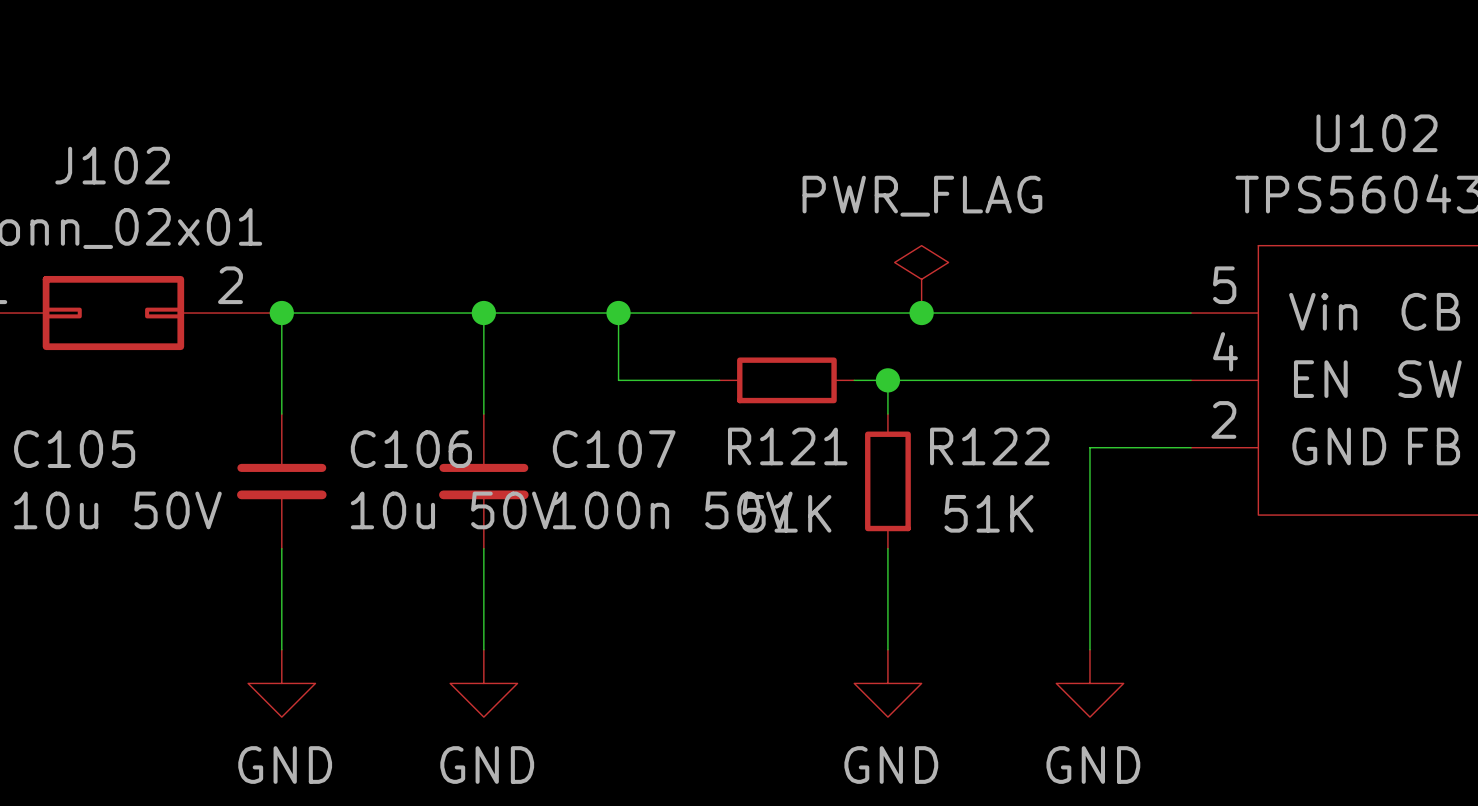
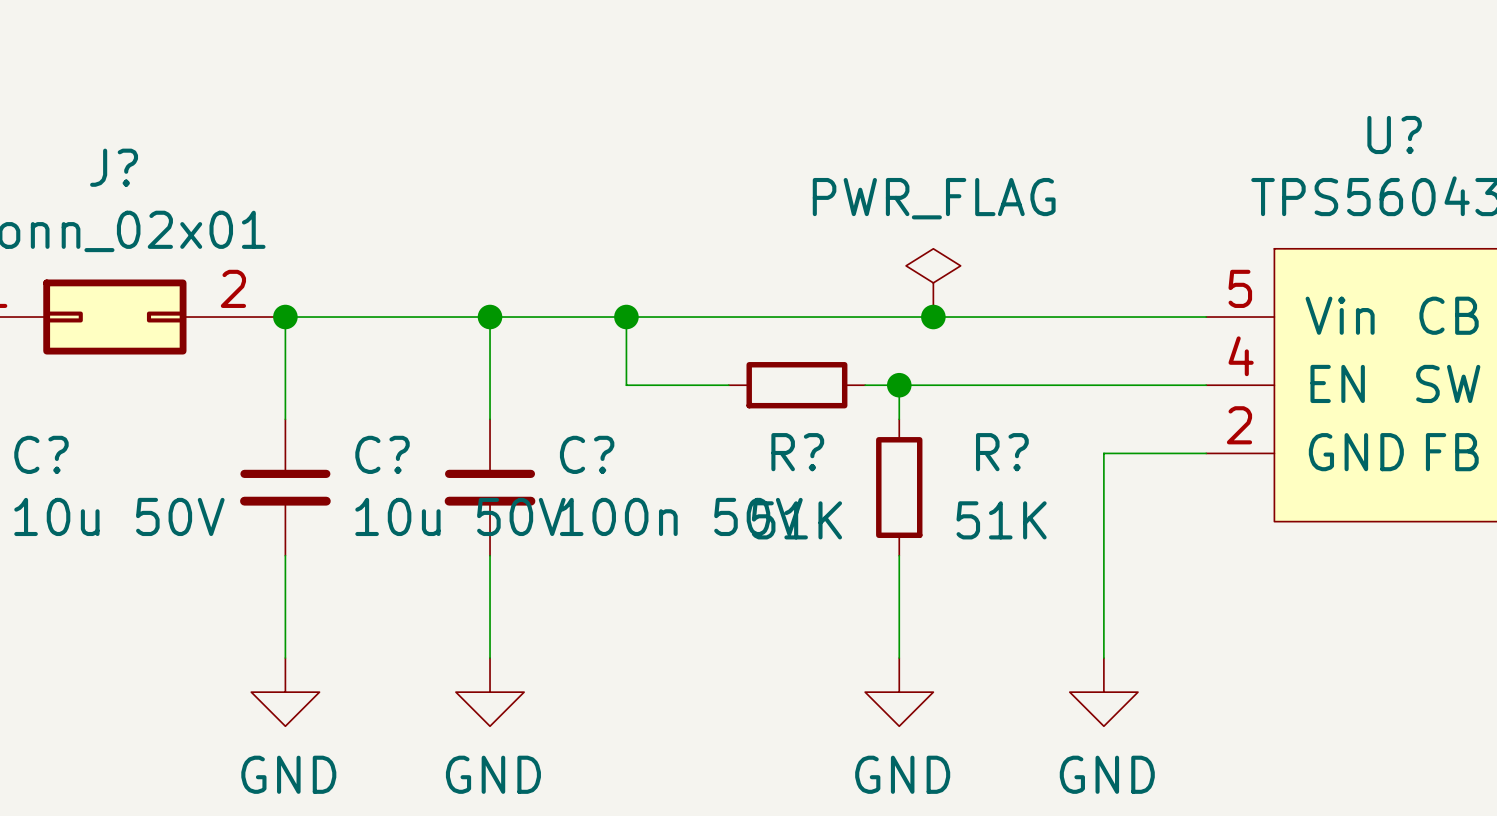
U102 name: U102 (1377, 133) -> U? (1394, 134)
J102 name: J102 (112, 165) -> J? (114, 167)
R121 name: R121 (787, 446) -> R? (797, 452)
R122 name: R122 (989, 446) -> R? (1002, 452)
C105 name: C105 (74, 449) -> C? (41, 454)
C106 name: C106 (411, 449) -> C? (382, 454)
C107 name: C107 (614, 449) -> C? (587, 454)

